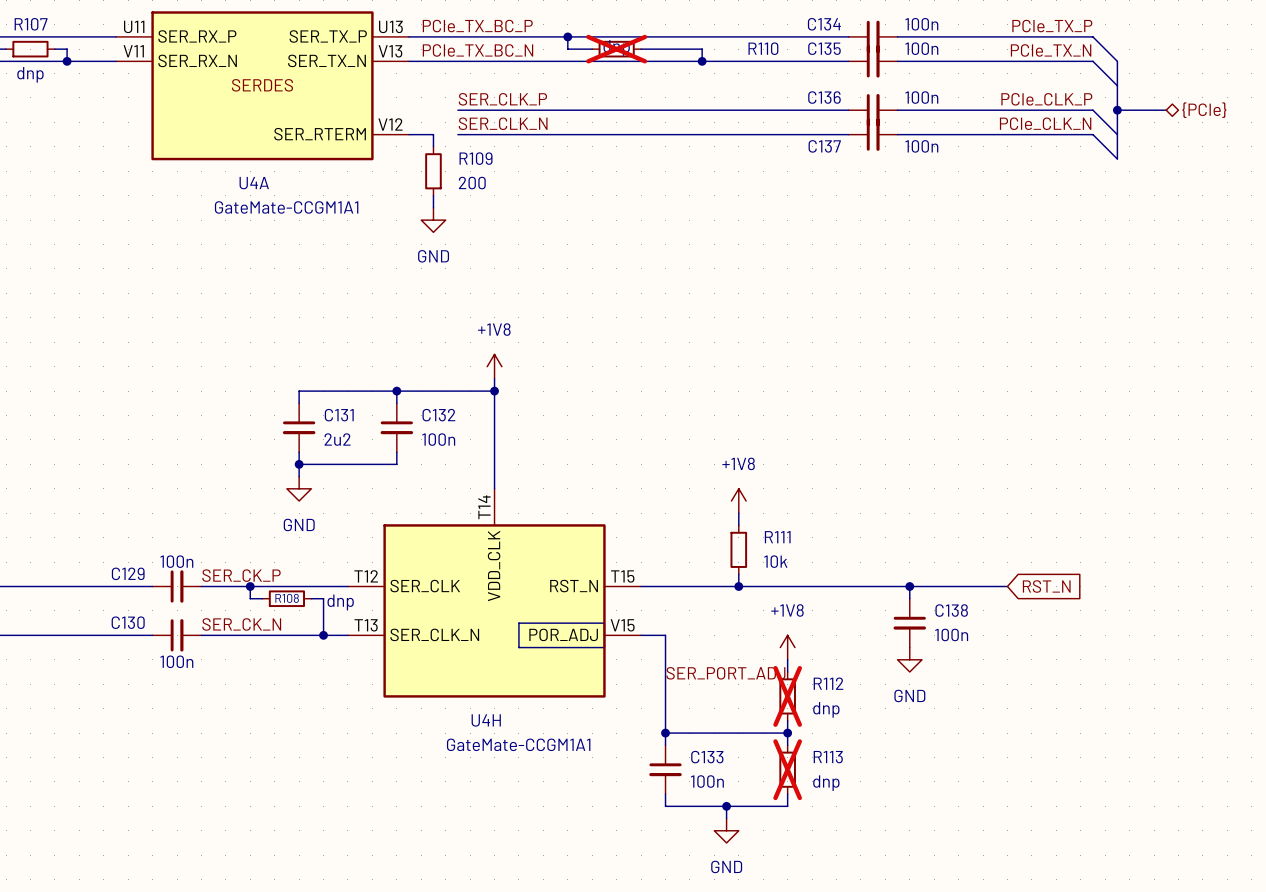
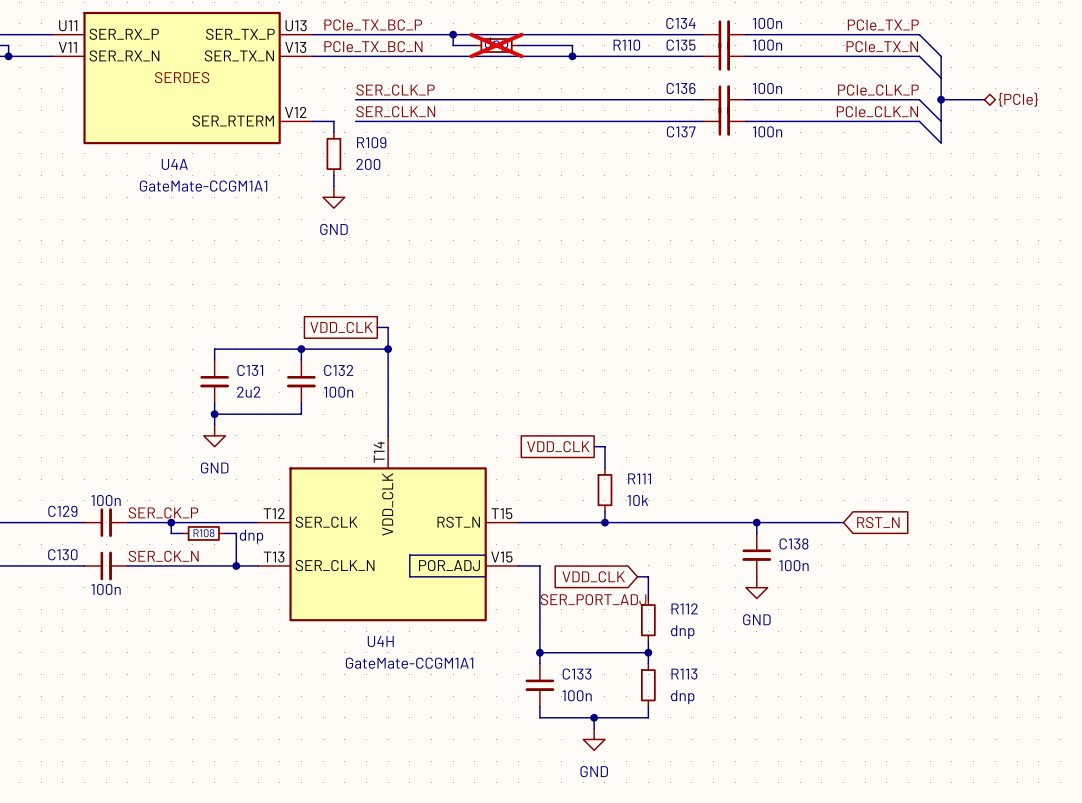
global label: none -> VDD_CLK (341, 327)
power symbol: +1V8 (494, 366) -> none
global label: none -> VDD_CLK (558, 446)
power symbol: +1V8 (738, 501) -> none
global label: none -> VDD_CLK (593, 576)
power symbol: +1V8 (787, 647) -> none
R112 do-not-place cross: (787, 696) -> none
R113 do-not-place cross: (787, 769) -> none

